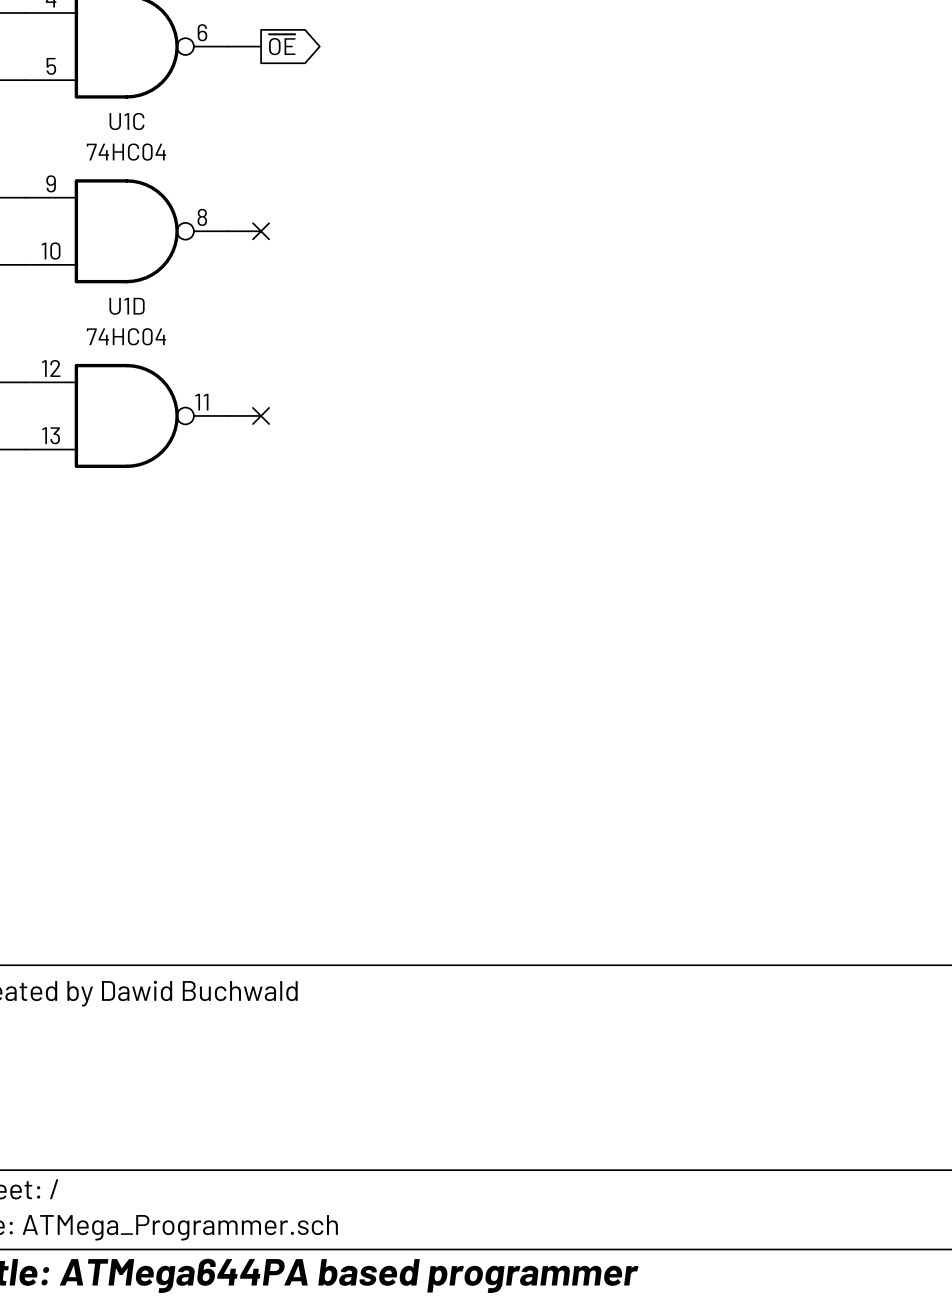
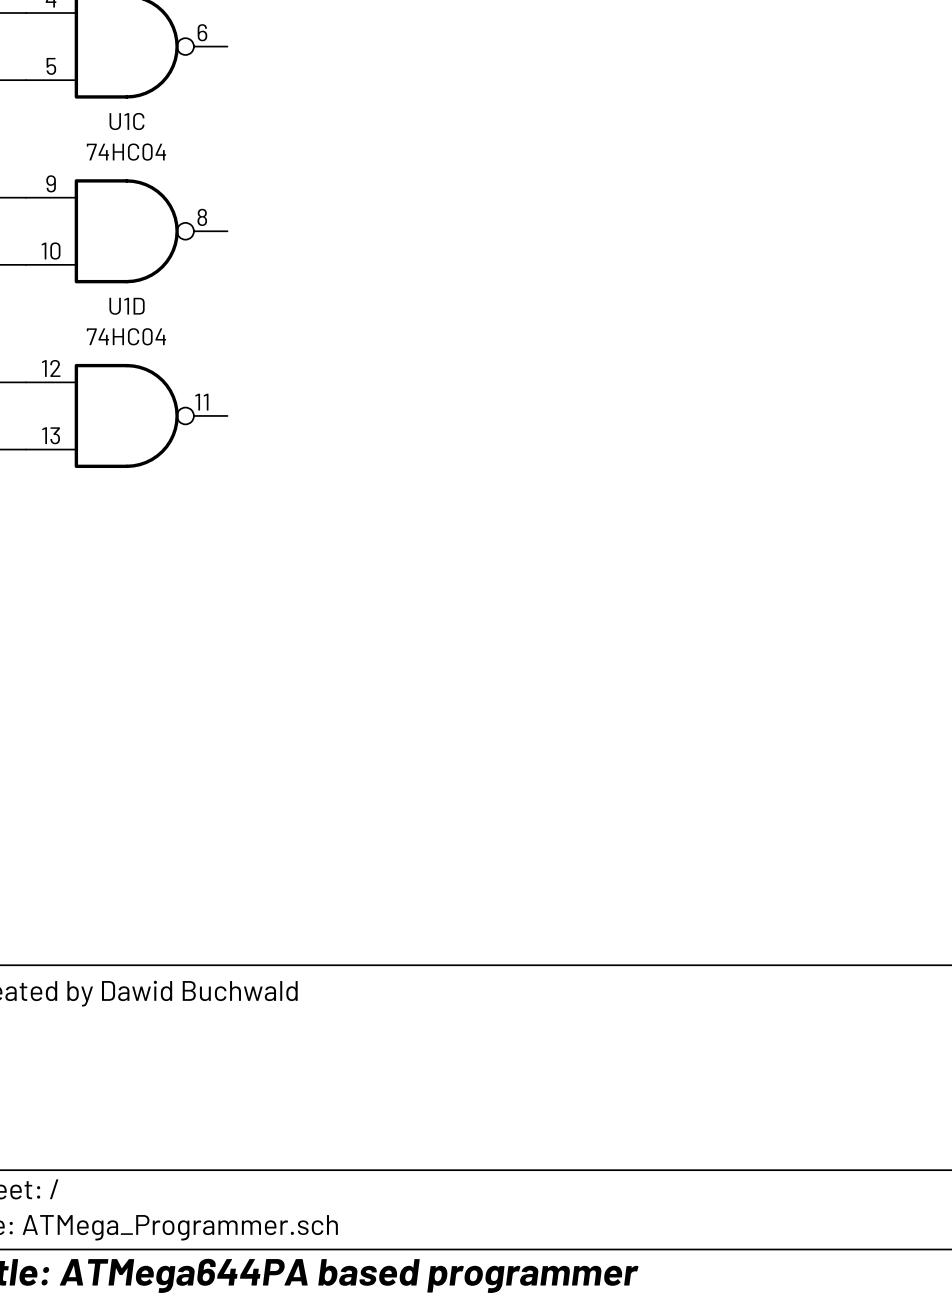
global label: ~{OE} (282, 44) -> none
wire: (227, 46) (261, 46) -> none
wire: (227, 231) (261, 231) -> none
no-connect mark: (261, 231) -> none
wire: (227, 415) (261, 415) -> none
no-connect mark: (261, 415) -> none

